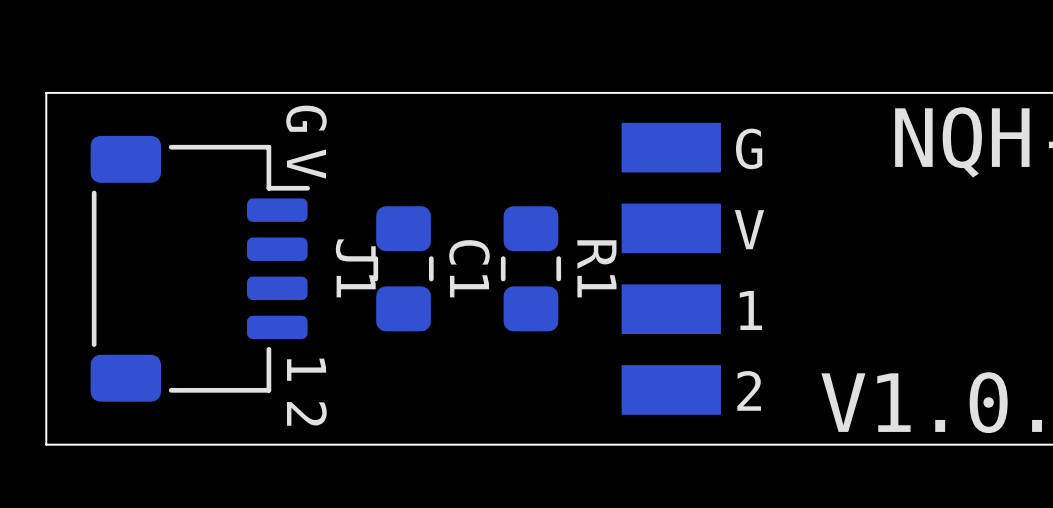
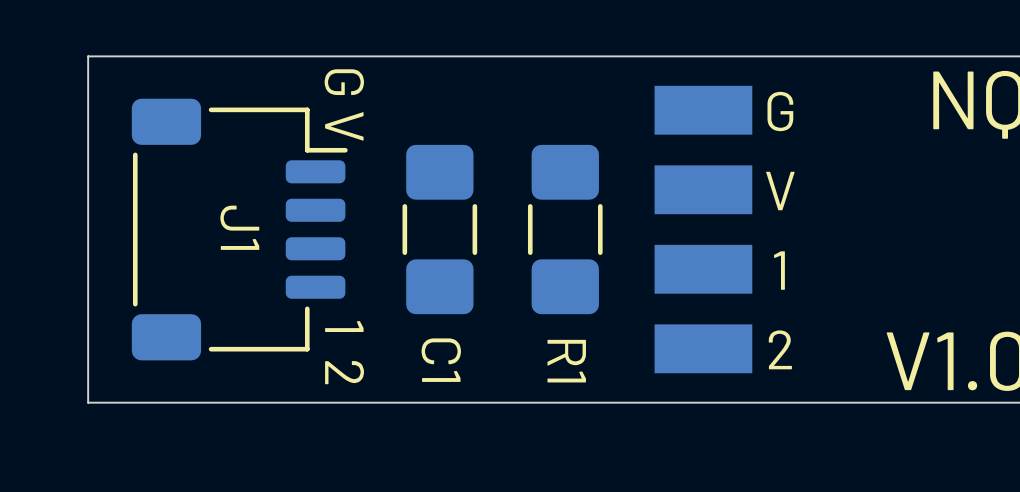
C1 footprint: [373, 206, 434, 332] -> [402, 144, 478, 315]
R1 footprint: [500, 206, 562, 332] -> [527, 144, 603, 315]
J1 name position: J1 (355, 268) -> J1 (239, 227)
C1 name position: C1 (469, 268) -> C1 (441, 360)
R1 name position: R1 (596, 268) -> R1 (566, 361)

